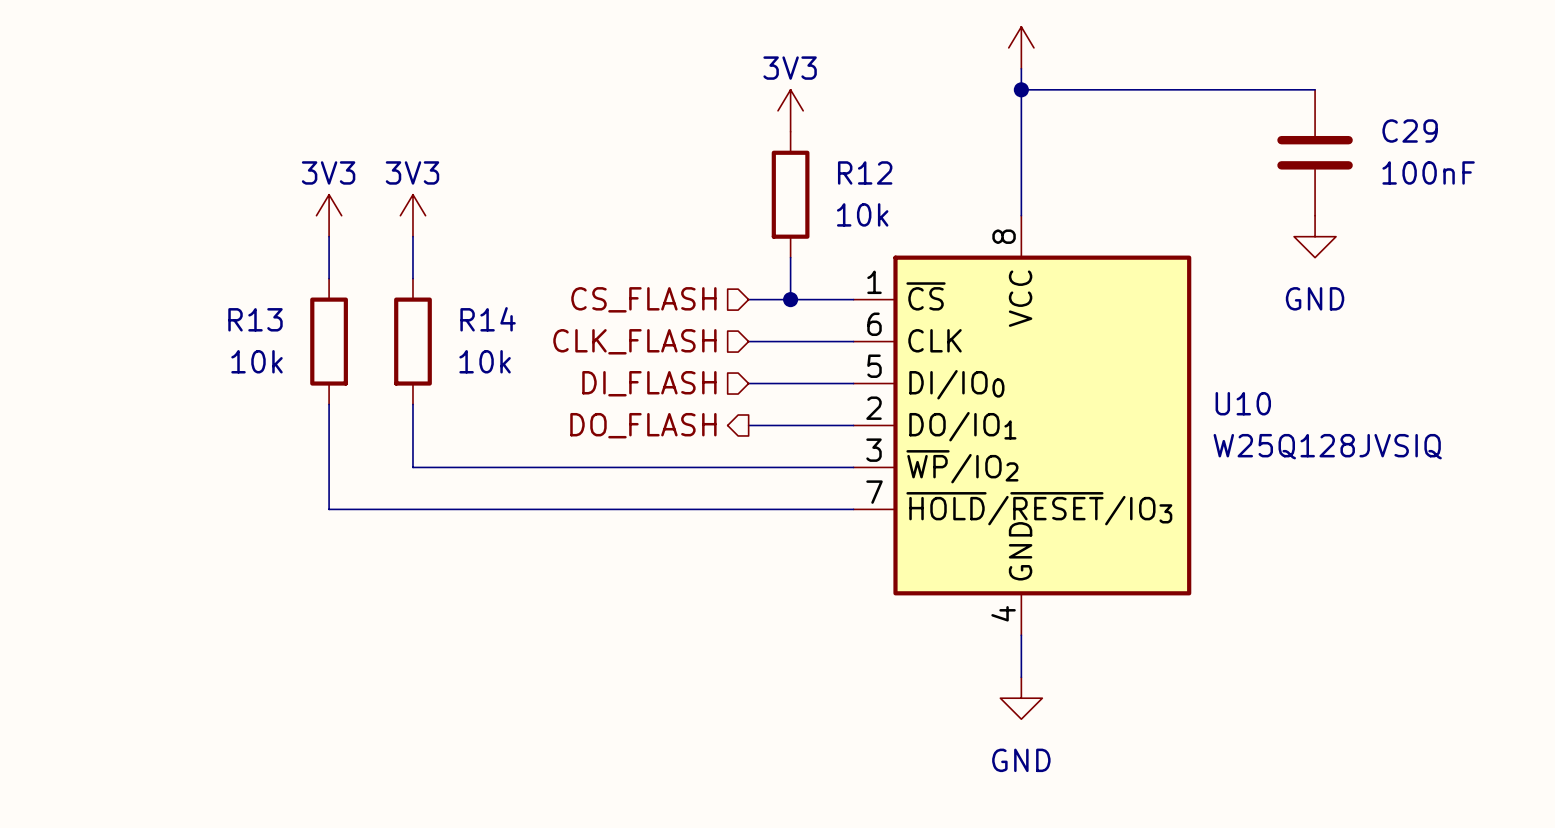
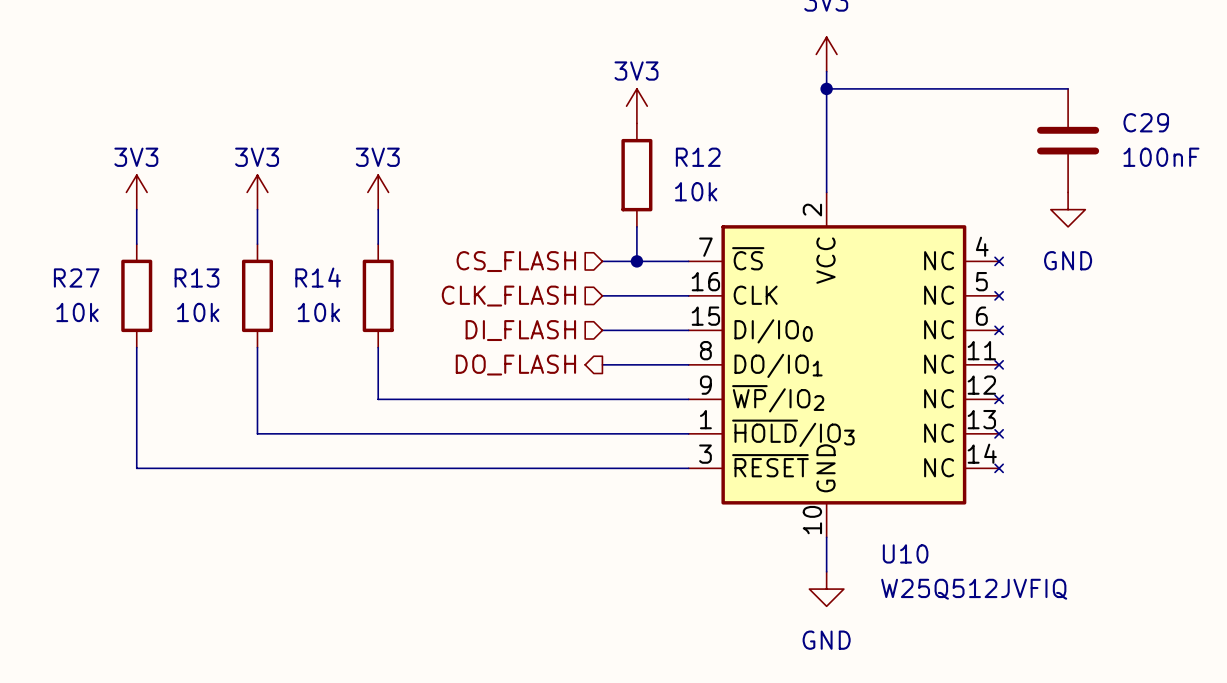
power symbol: none -> 3V3 (136, 192)
power symbol position: 3V3 (412, 215) -> 3V3 (378, 192)
U10 symbol: [853, 215, 1192, 636] -> [688, 192, 1004, 538]
wire: none -> (136, 209) (136, 244)
wire: (412, 236) (412, 278) -> (378, 209) (378, 244)
R14 name position: R14 (488, 319) -> R14 (318, 277)
R27: none -> 10k (136, 295)
R14 position: (412, 341) -> (378, 295)
R14 value position: 10k (485, 361) -> 10k (318, 312)
U10 name position: U10 (1243, 403) -> U10 (905, 553)
wire: none -> (136, 347) (136, 468) (688, 468)
wire: (412, 404) (412, 467) (475, 467) -> (378, 347) (378, 399)
U10 value: W25Q128JVSIQ (1327, 446) -> W25Q512JVFIQ (974, 589)

